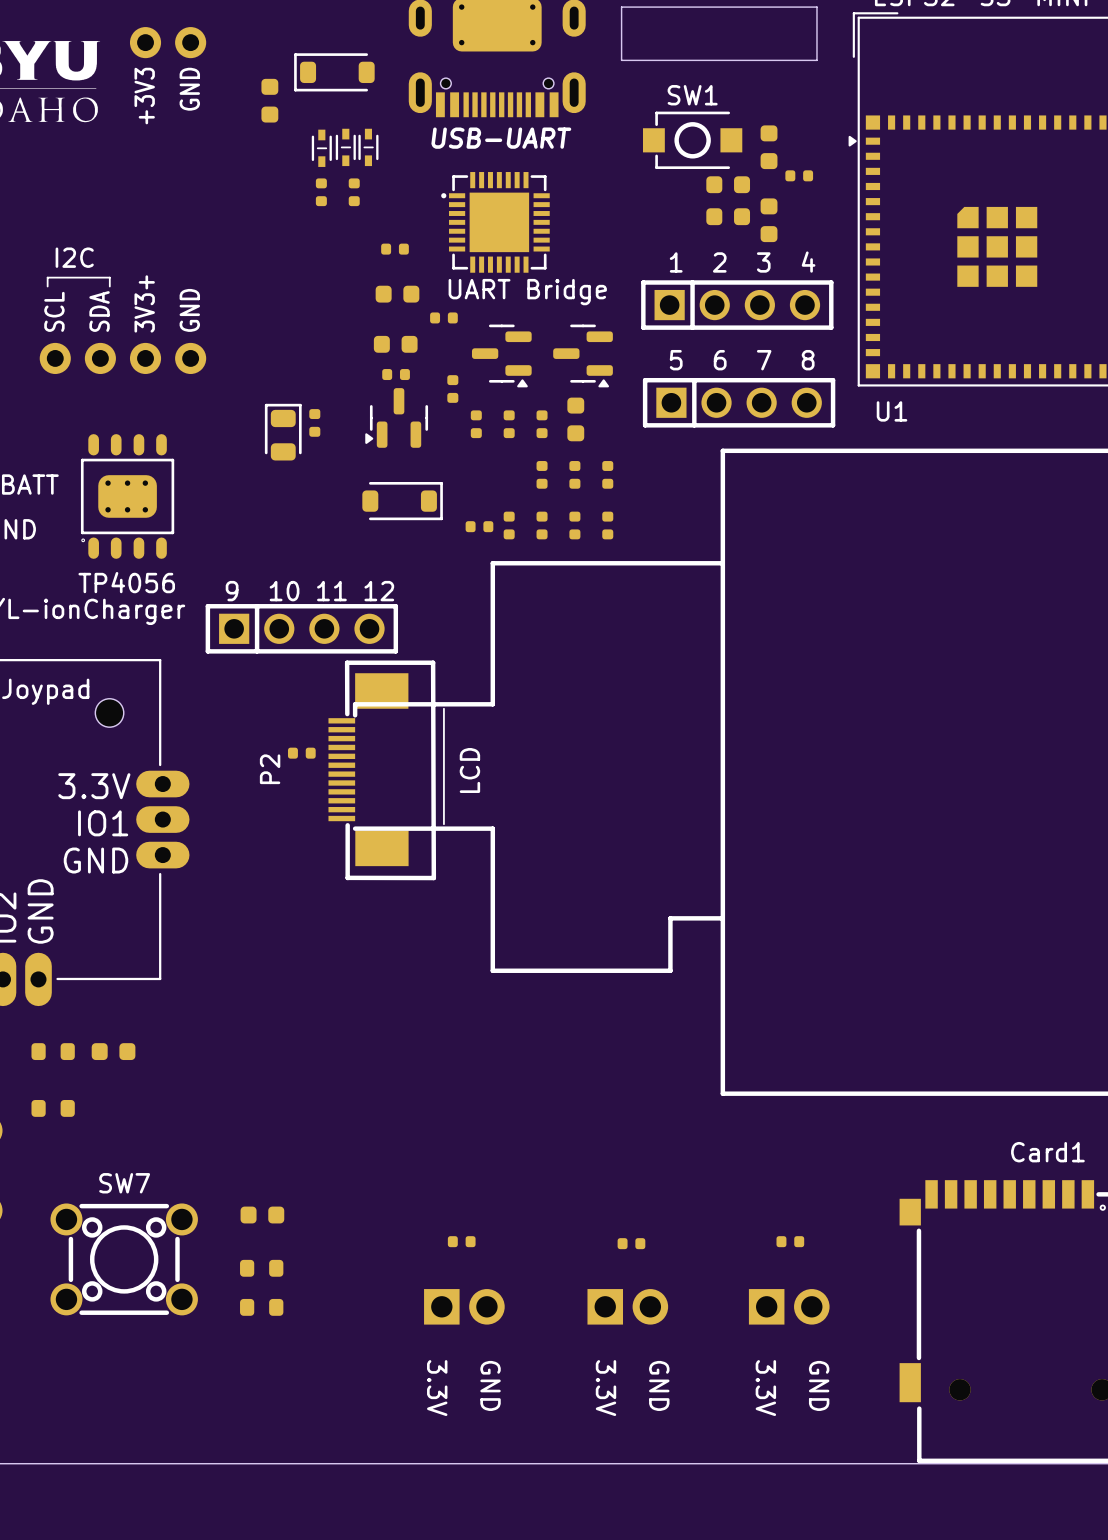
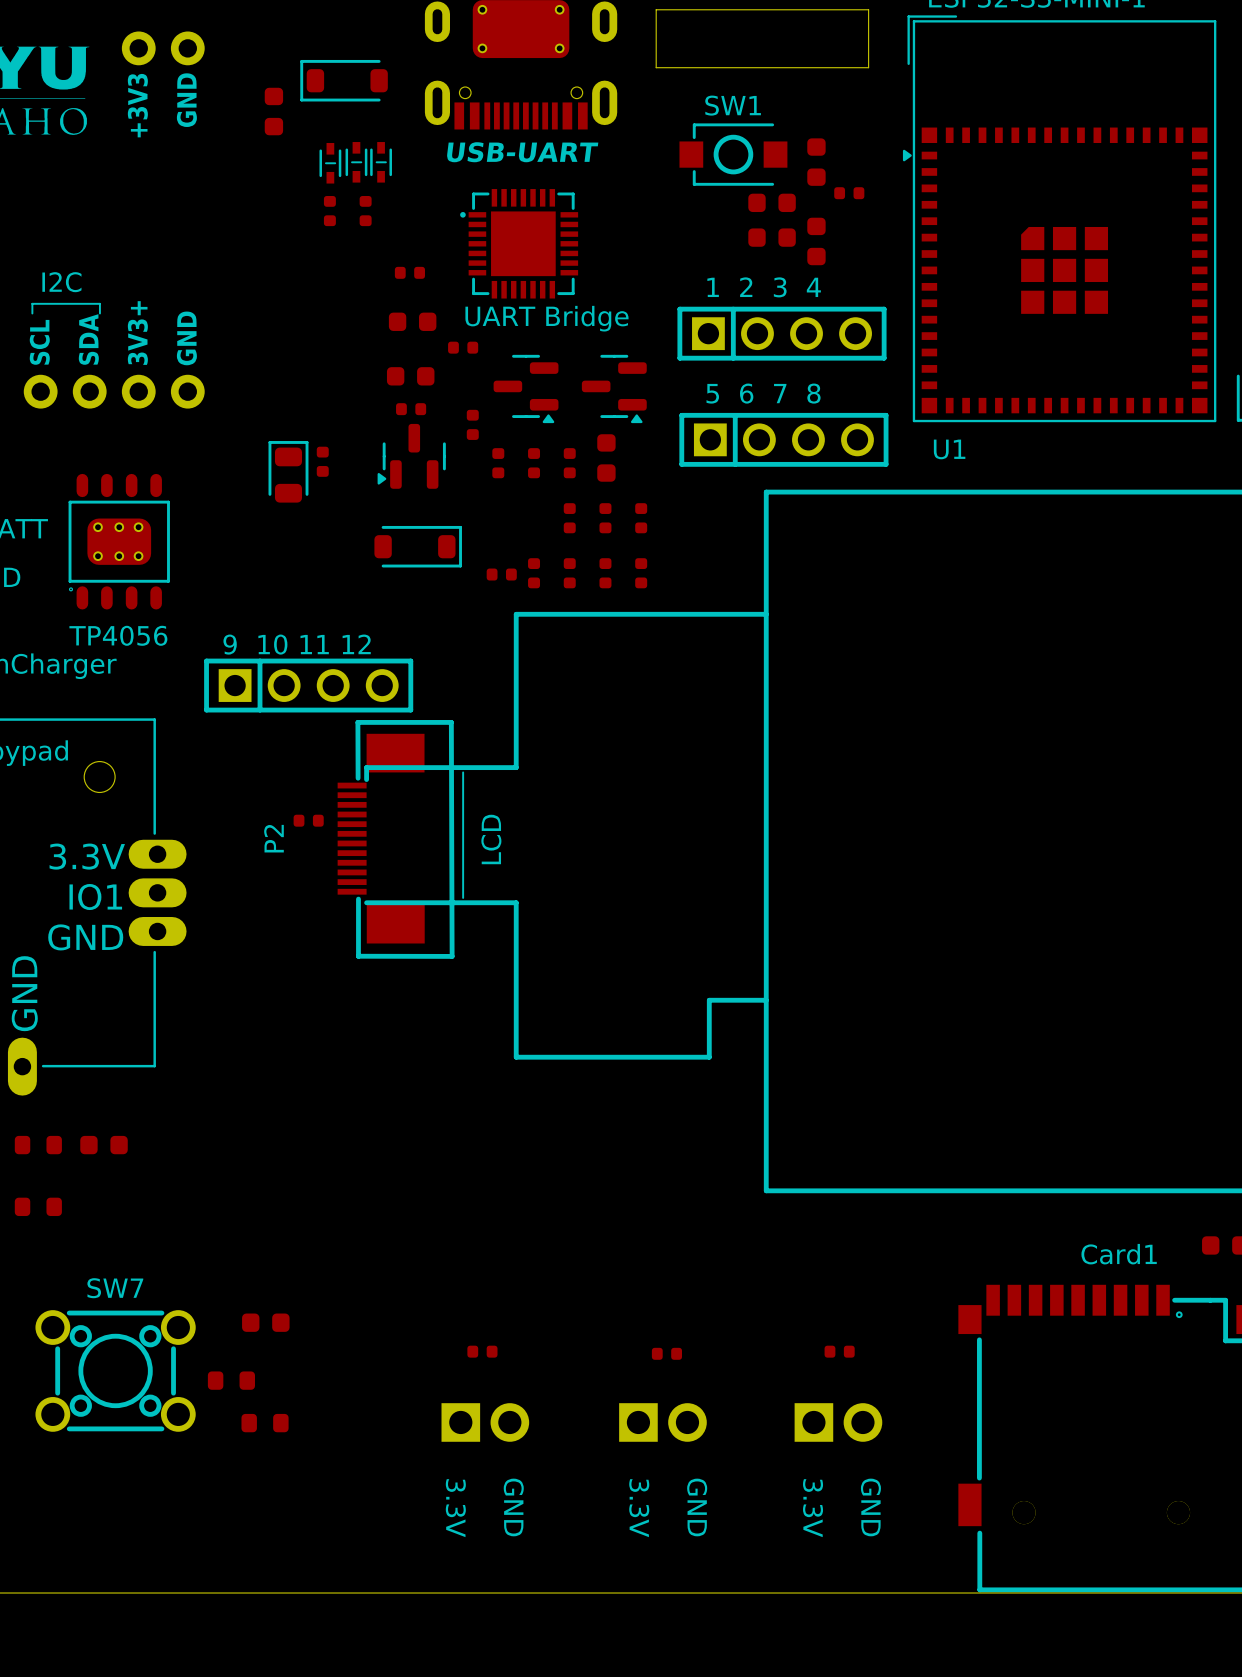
part position: (261, 1268) -> (231, 1380)

